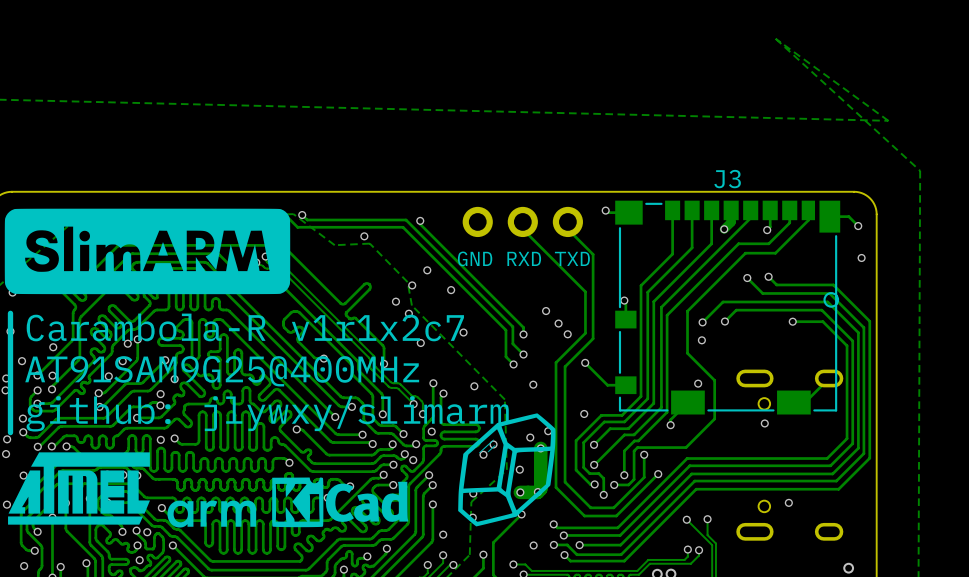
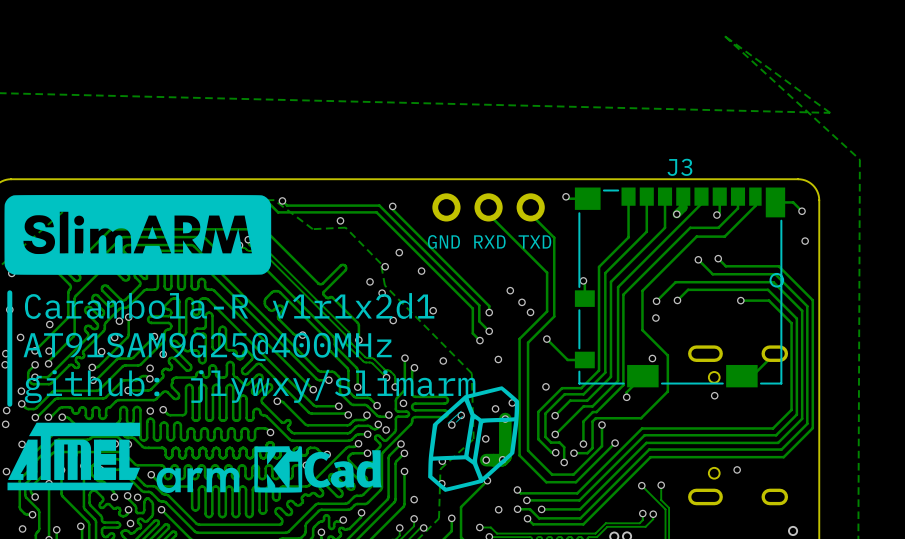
text: Carambola-R v1r1x2c7 (245, 327) -> Carambola-R v1r1x2d1 (229, 306)

